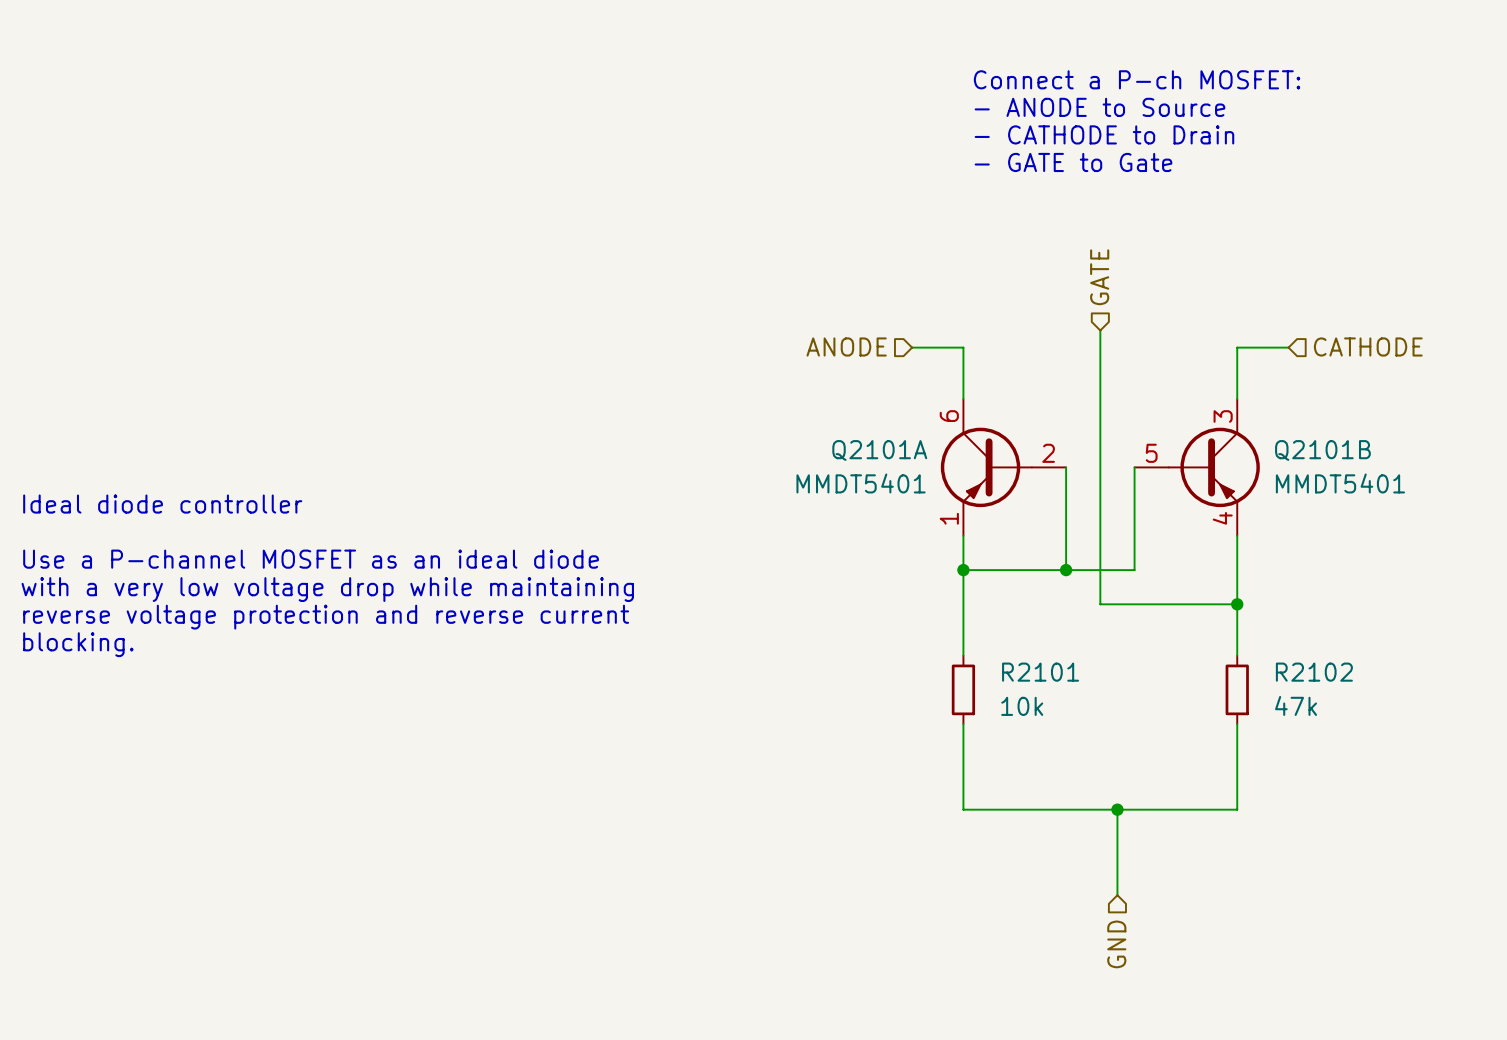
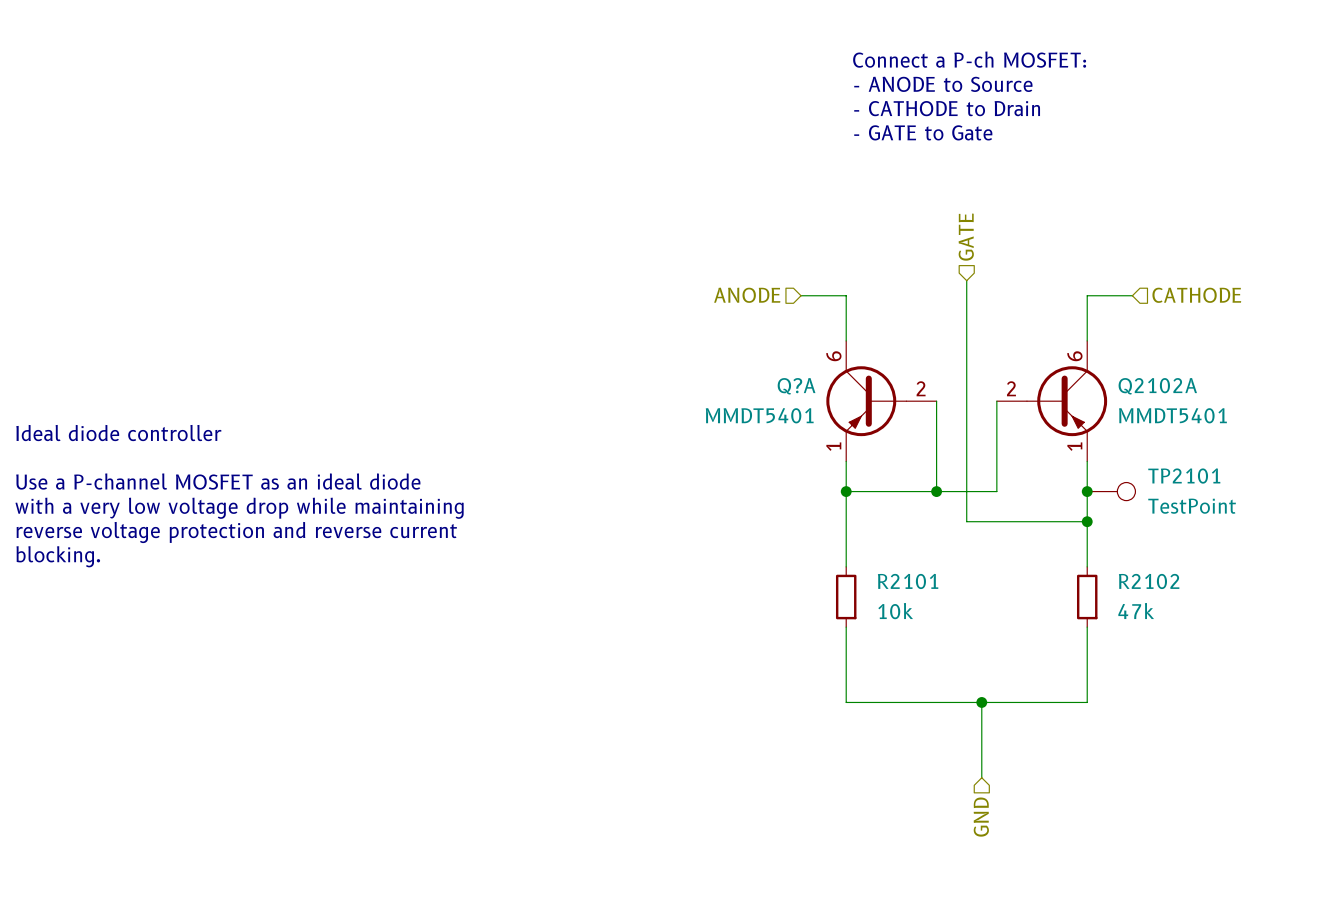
Q2101B pin number: 3 (1223, 416) -> 6 (1074, 356)
Q2101A name: Q2101A (879, 450) -> Q?A (796, 386)
Q2101B name: Q2101B (1322, 450) -> Q2102A (1157, 386)
Q2101B pin number: 5 (1151, 453) -> 2 (1011, 388)
Q2101B pin number: 4 (1222, 518) -> 1 (1074, 446)
junction: none -> (1087, 491)
TP2101: none -> TestPoint (1111, 491)

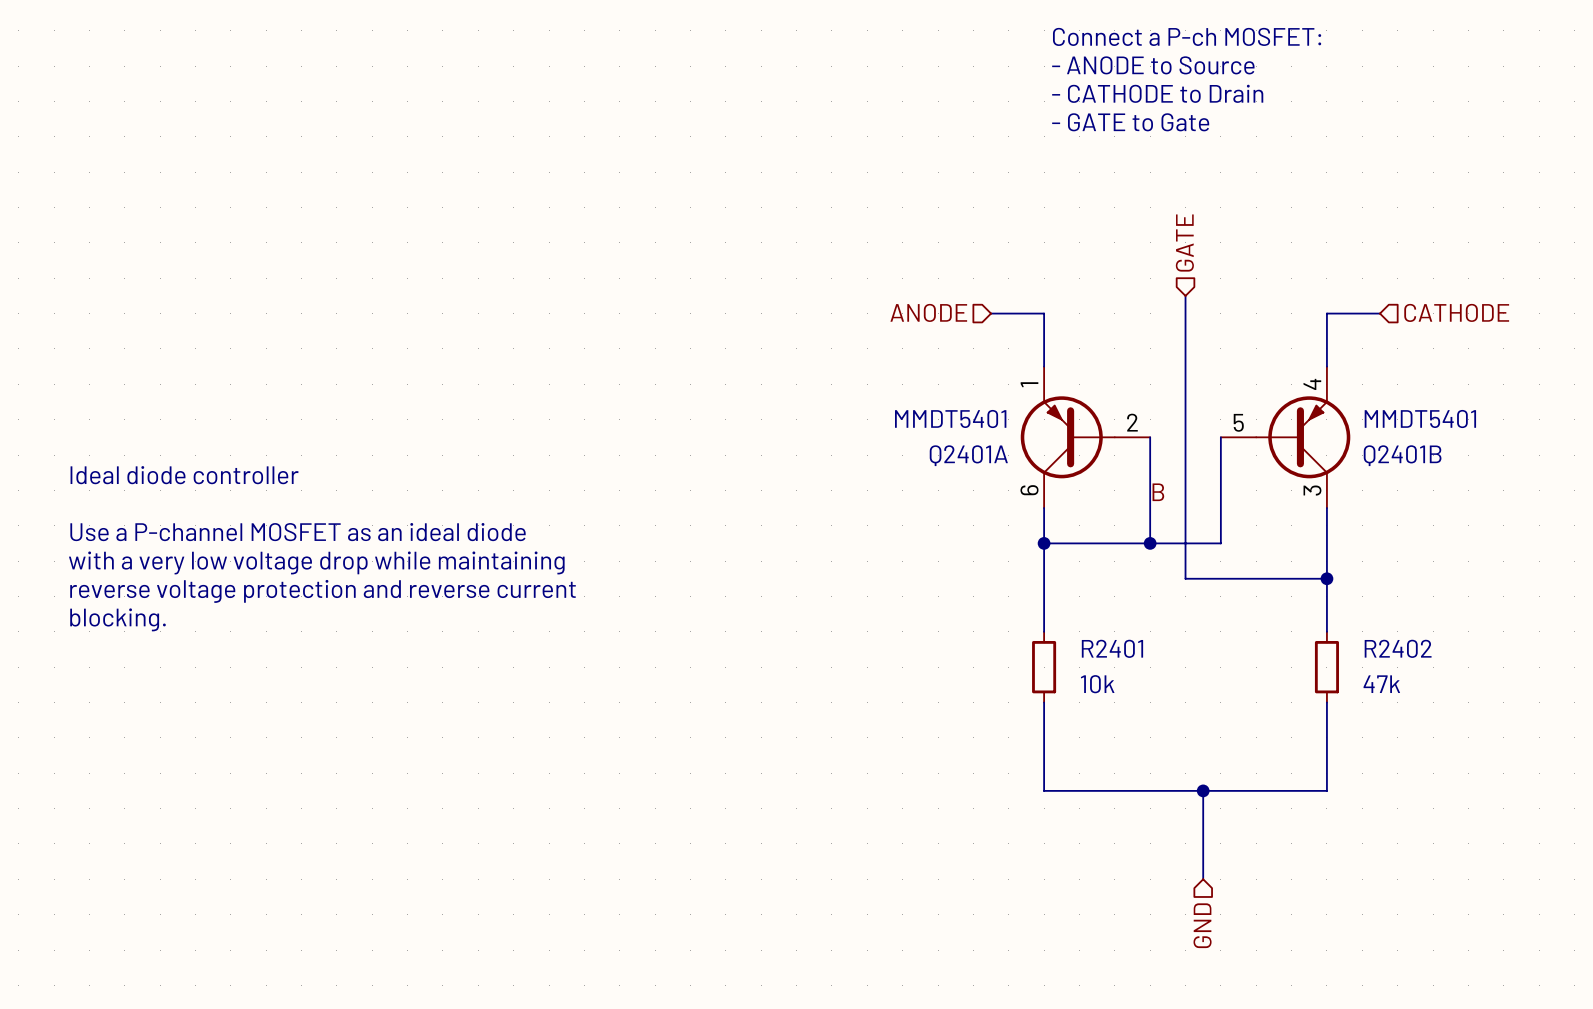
Q?A: MMDT5401 (881, 401) -> none
Q2401A: none -> MMDT5401 (1085, 437)
Q2102A: MMDT5401 (1051, 401) -> none
Q2401B: none -> MMDT5401 (1285, 437)
label: none -> B (1158, 492)
junction: (1087, 491) -> none
TP2101: TestPoint (1111, 491) -> none
R2101 name: R2101 (908, 581) -> R2401 (1112, 648)
R2102 name: R2102 (1149, 581) -> R2402 (1398, 648)

